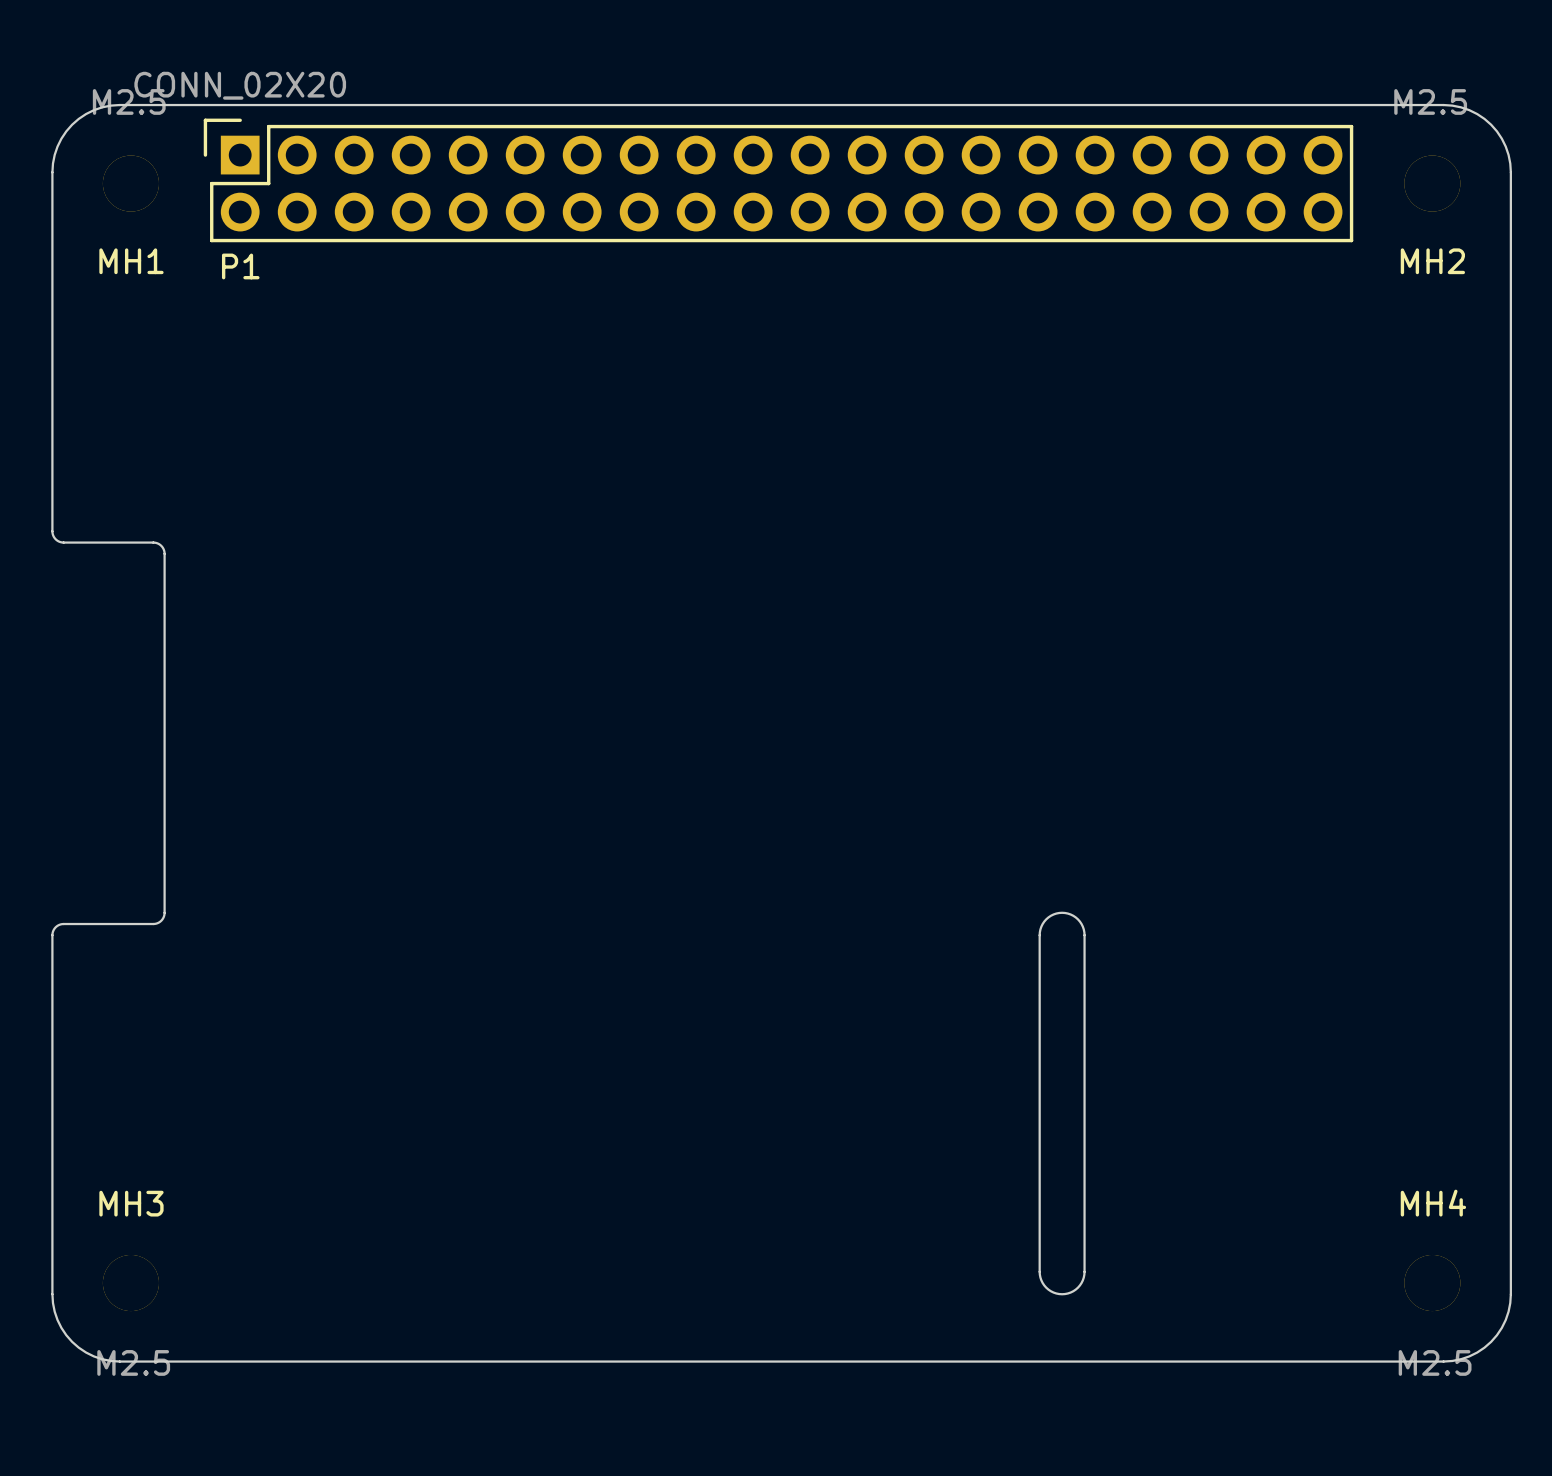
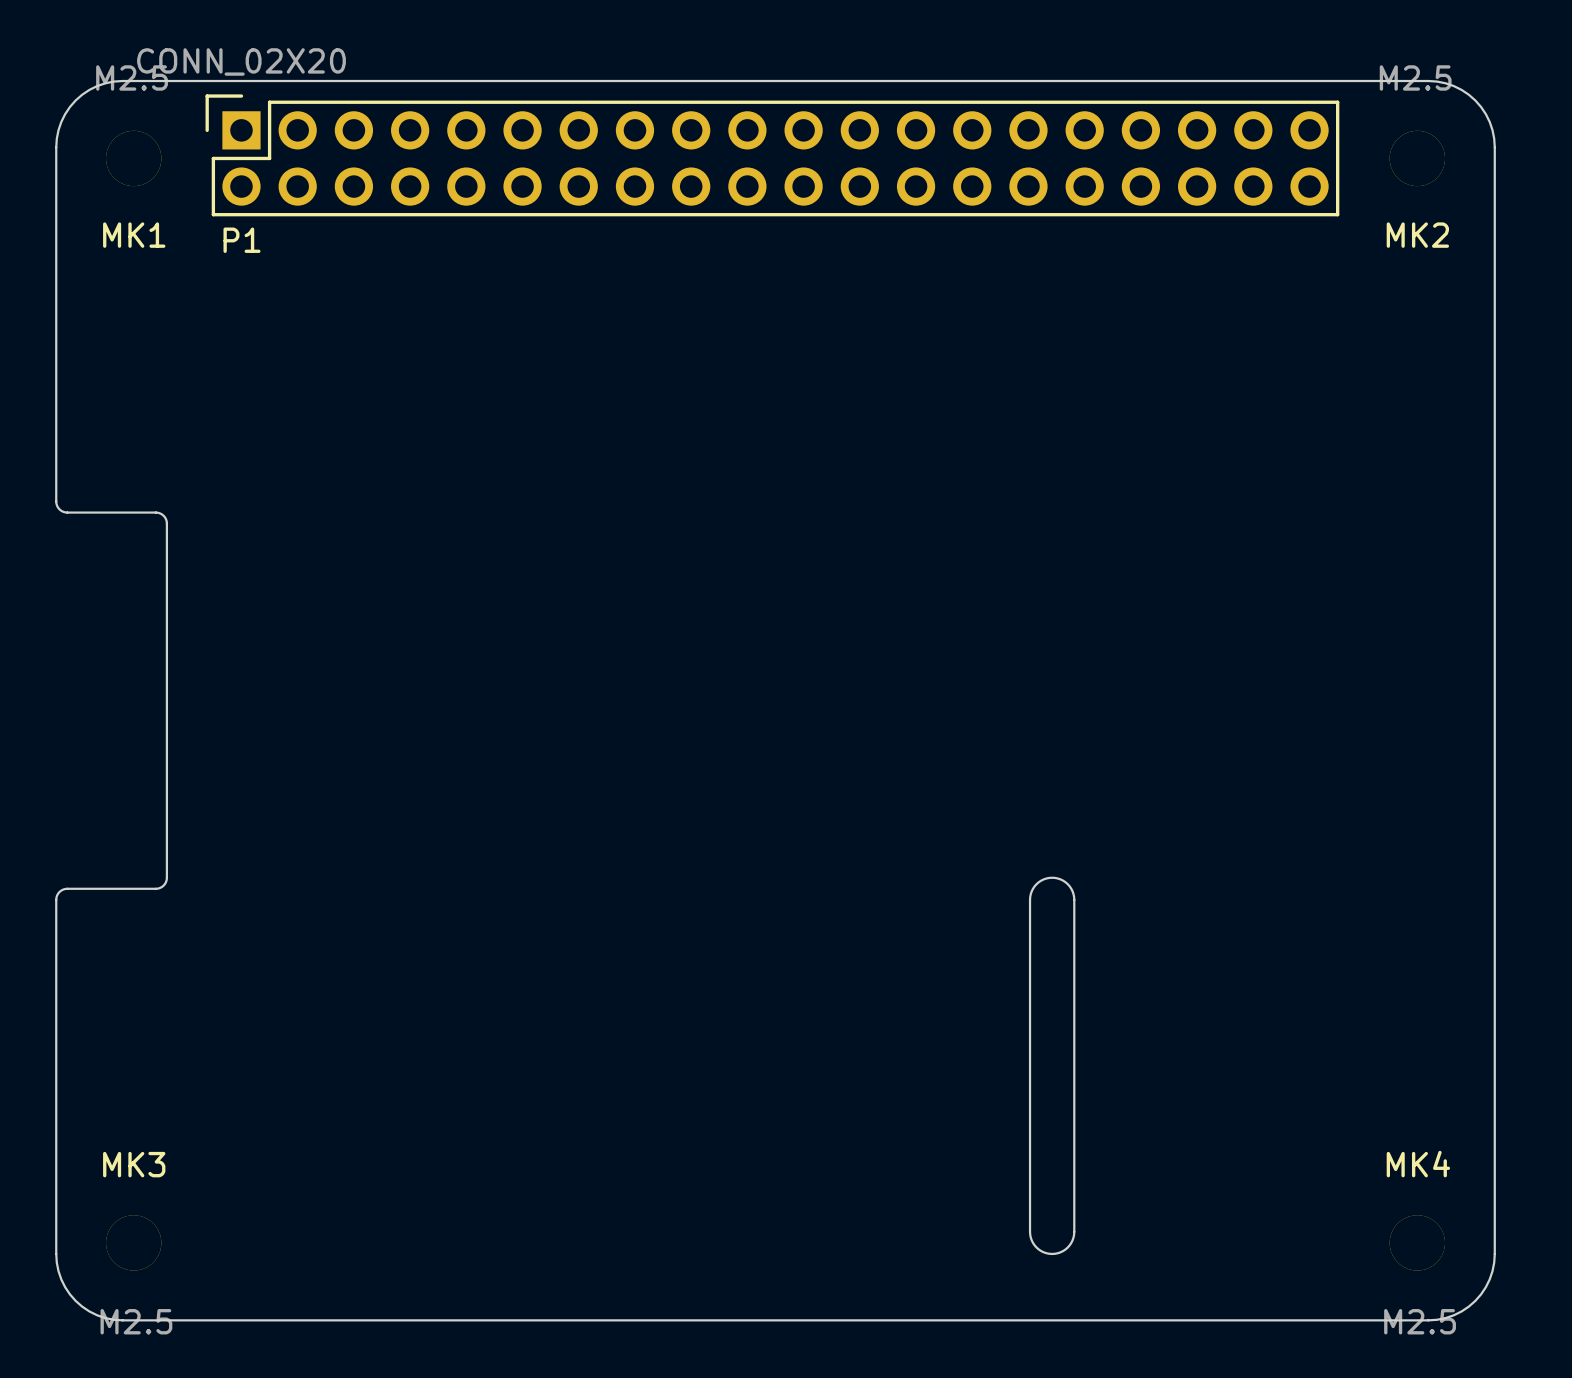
MH1 name: MH1 (131, 261) -> MK1 (134, 235)
MH2 name: MH2 (1432, 261) -> MK2 (1417, 235)
MH3 name: MH3 (131, 1203) -> MK3 (134, 1164)
MH4 name: MH4 (1433, 1203) -> MK4 (1418, 1164)

